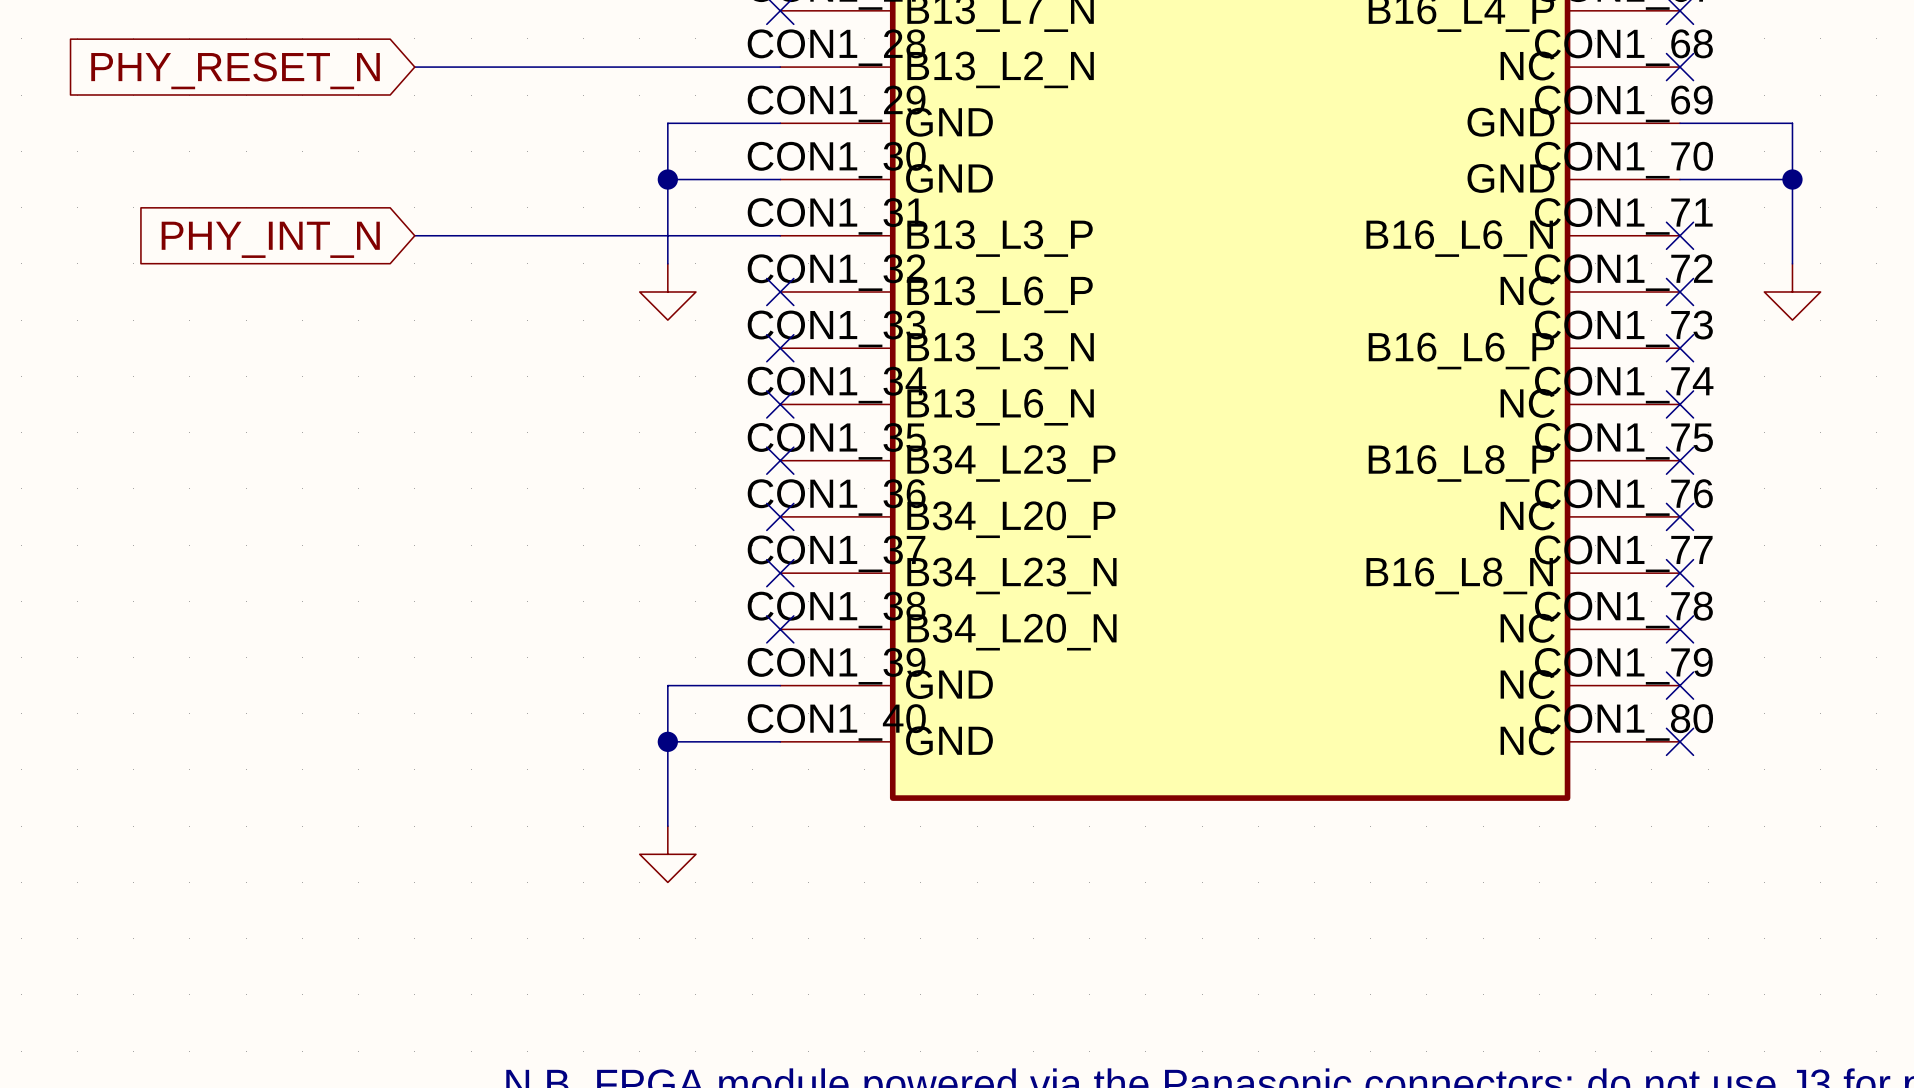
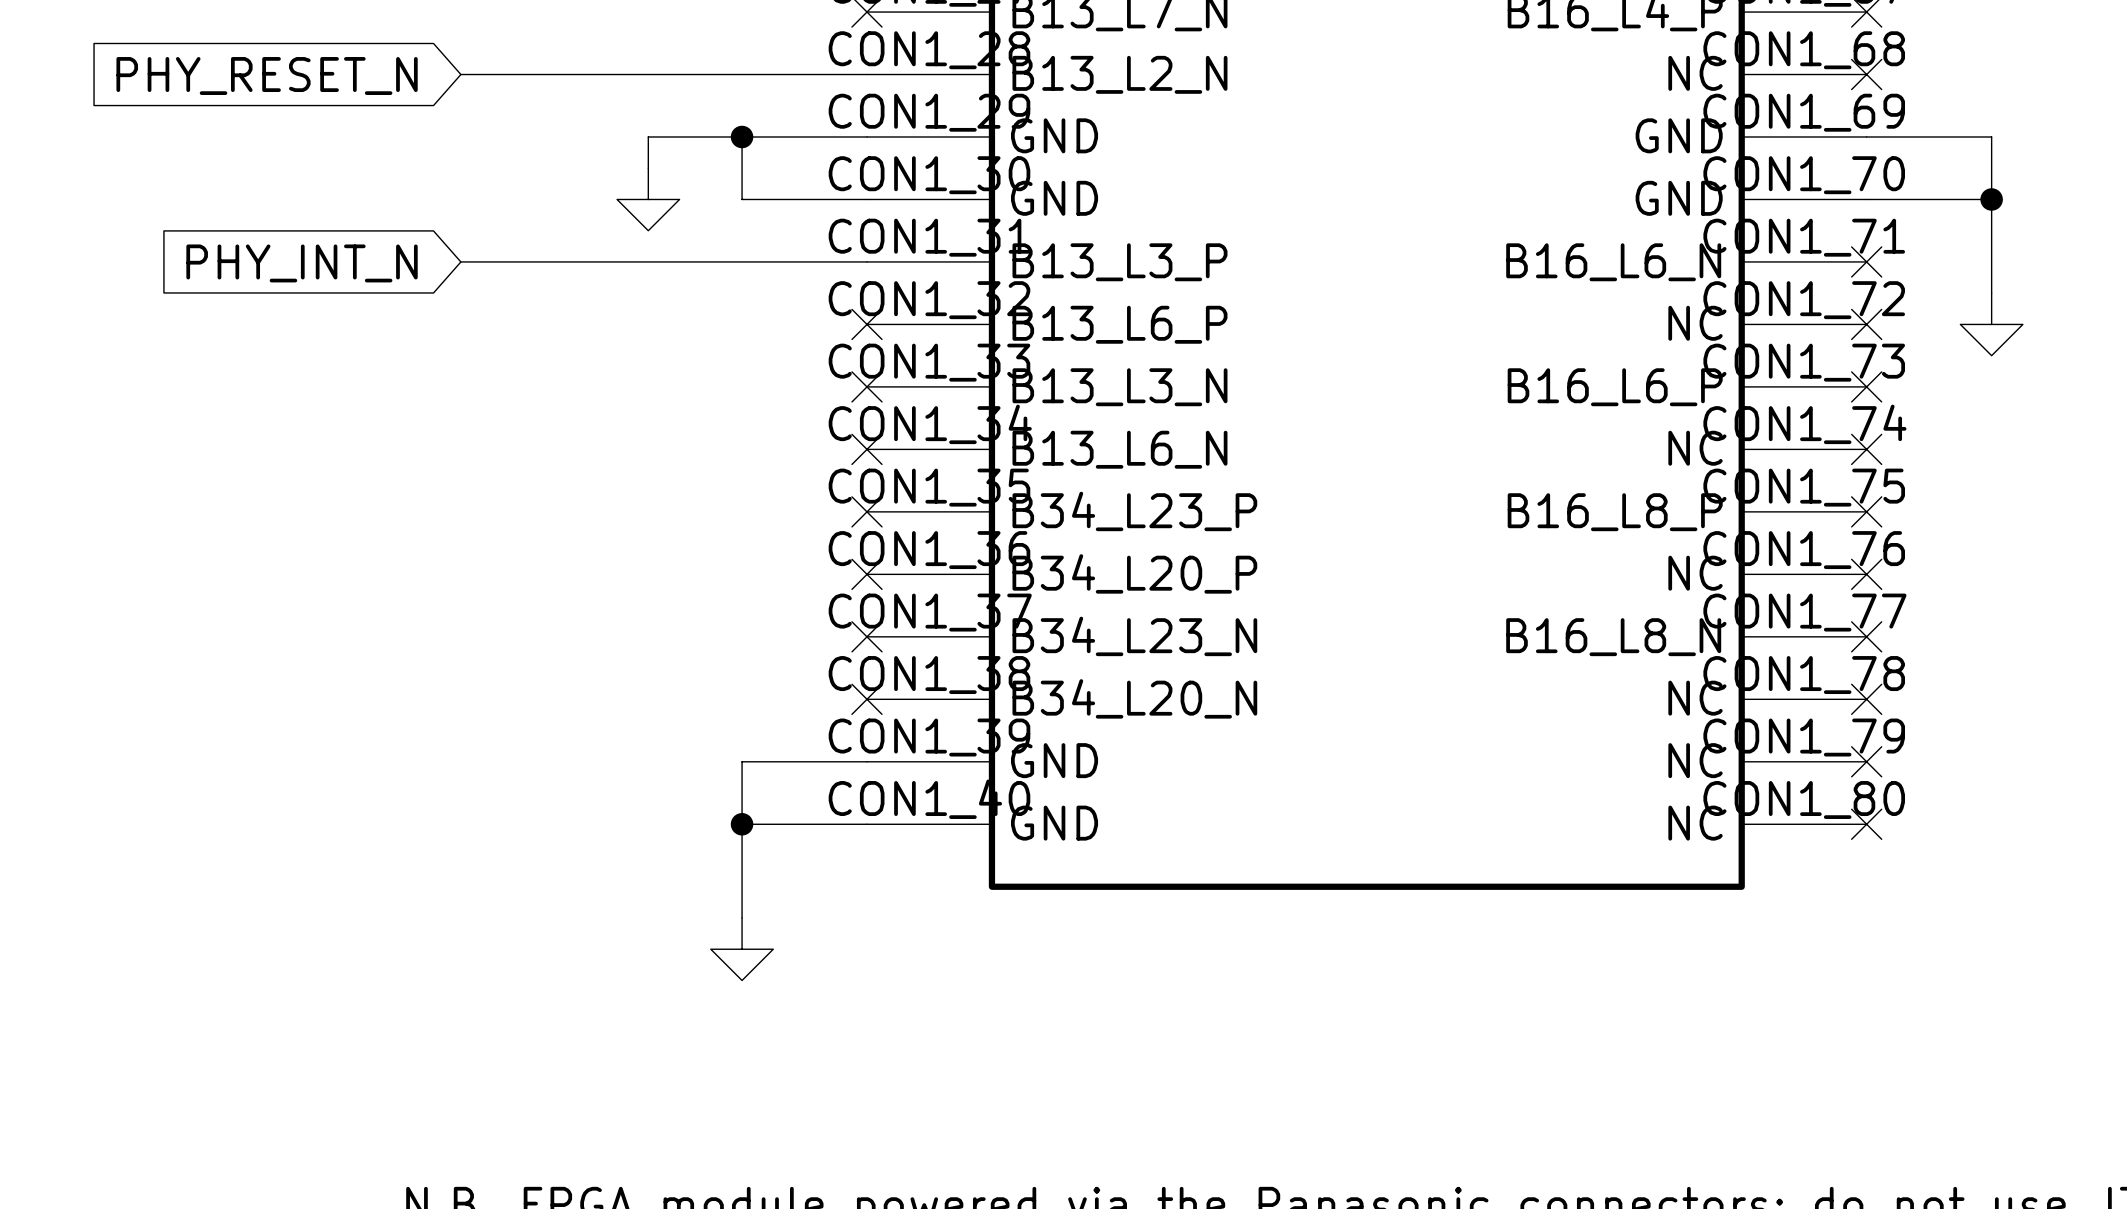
wire: none -> (742, 137) (648, 137) (648, 168)
wire: (667, 179) (667, 263) -> none
junction position: (667, 179) -> (742, 137)
power symbol position: (667, 291) -> (648, 199)

